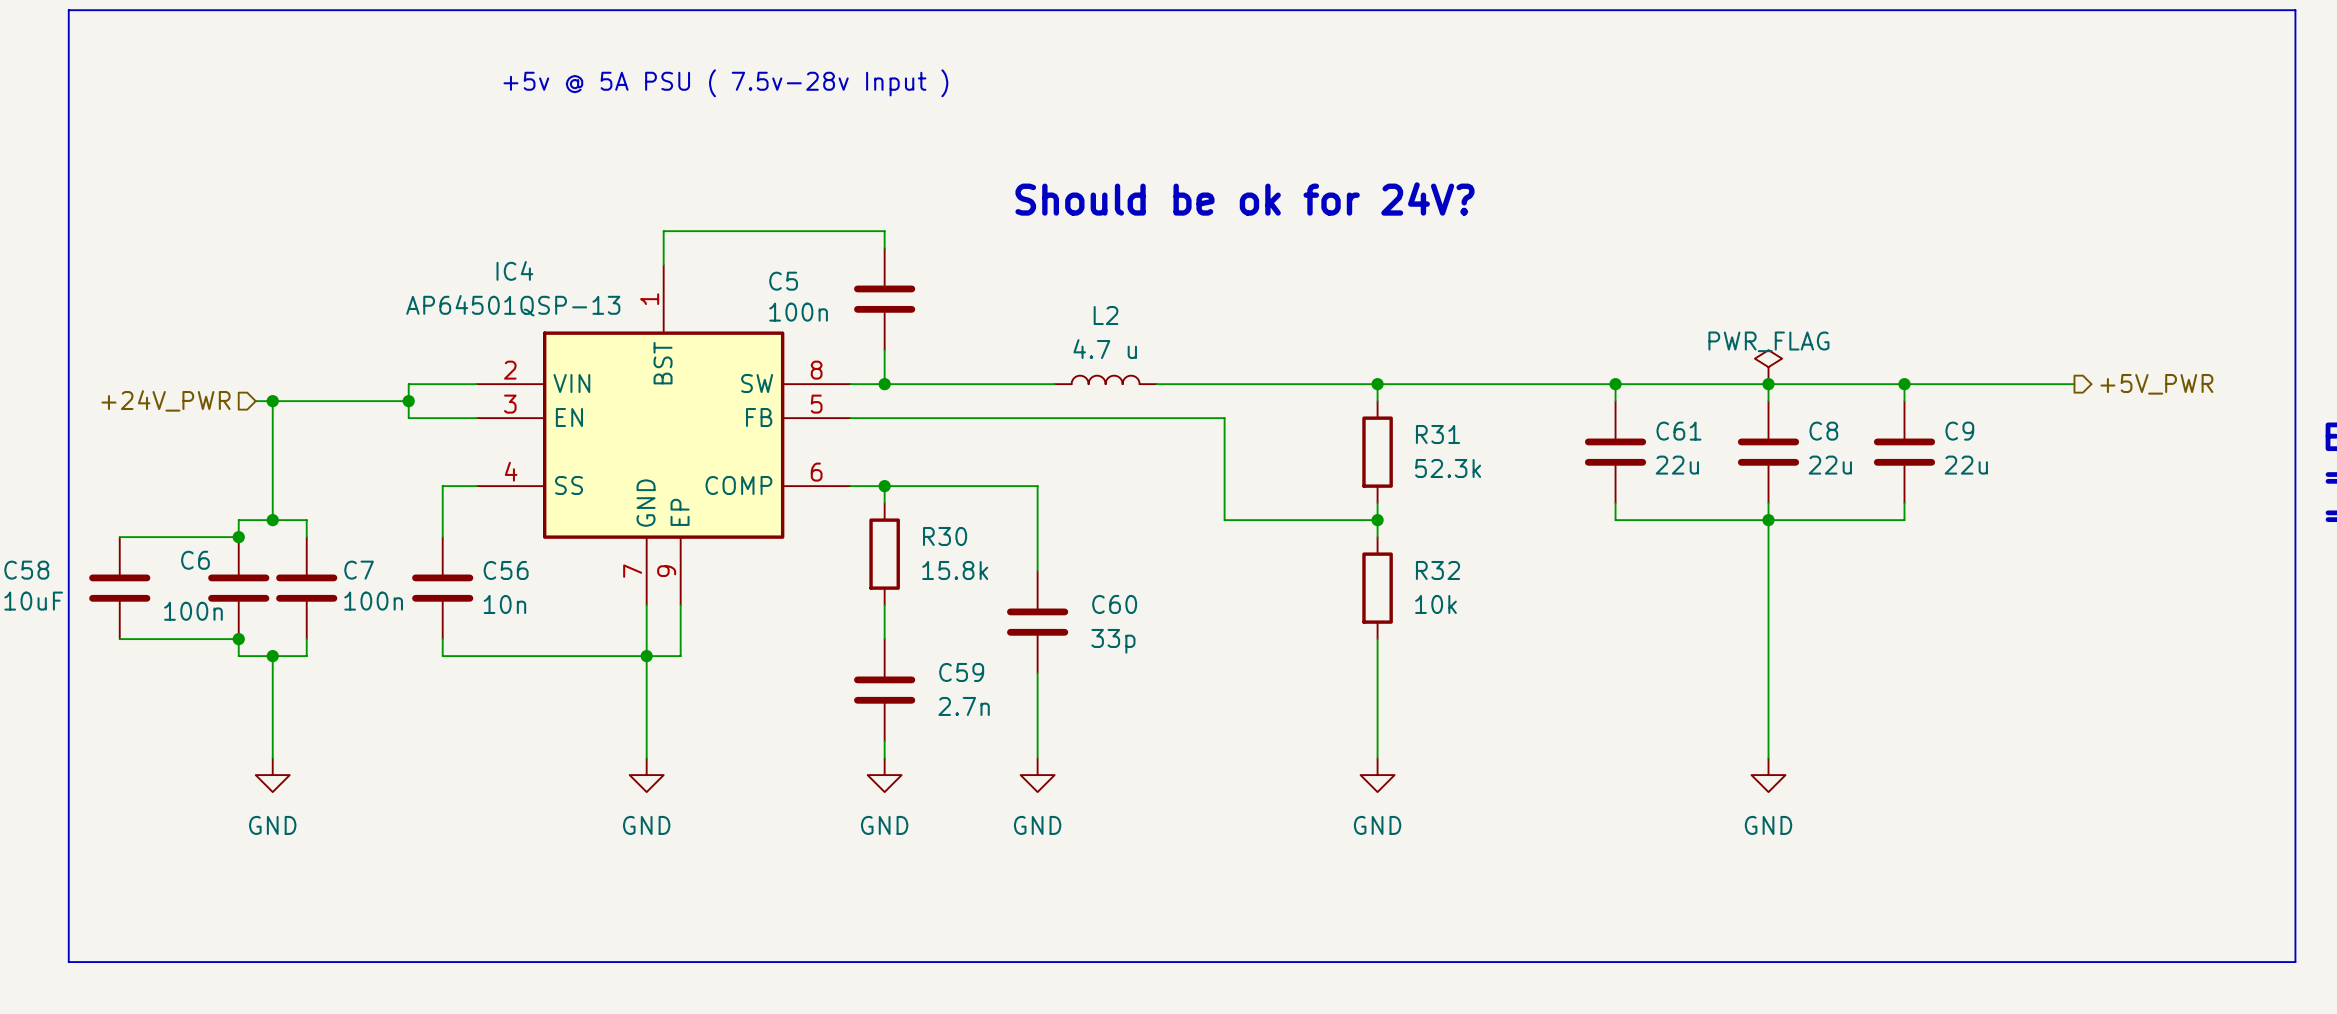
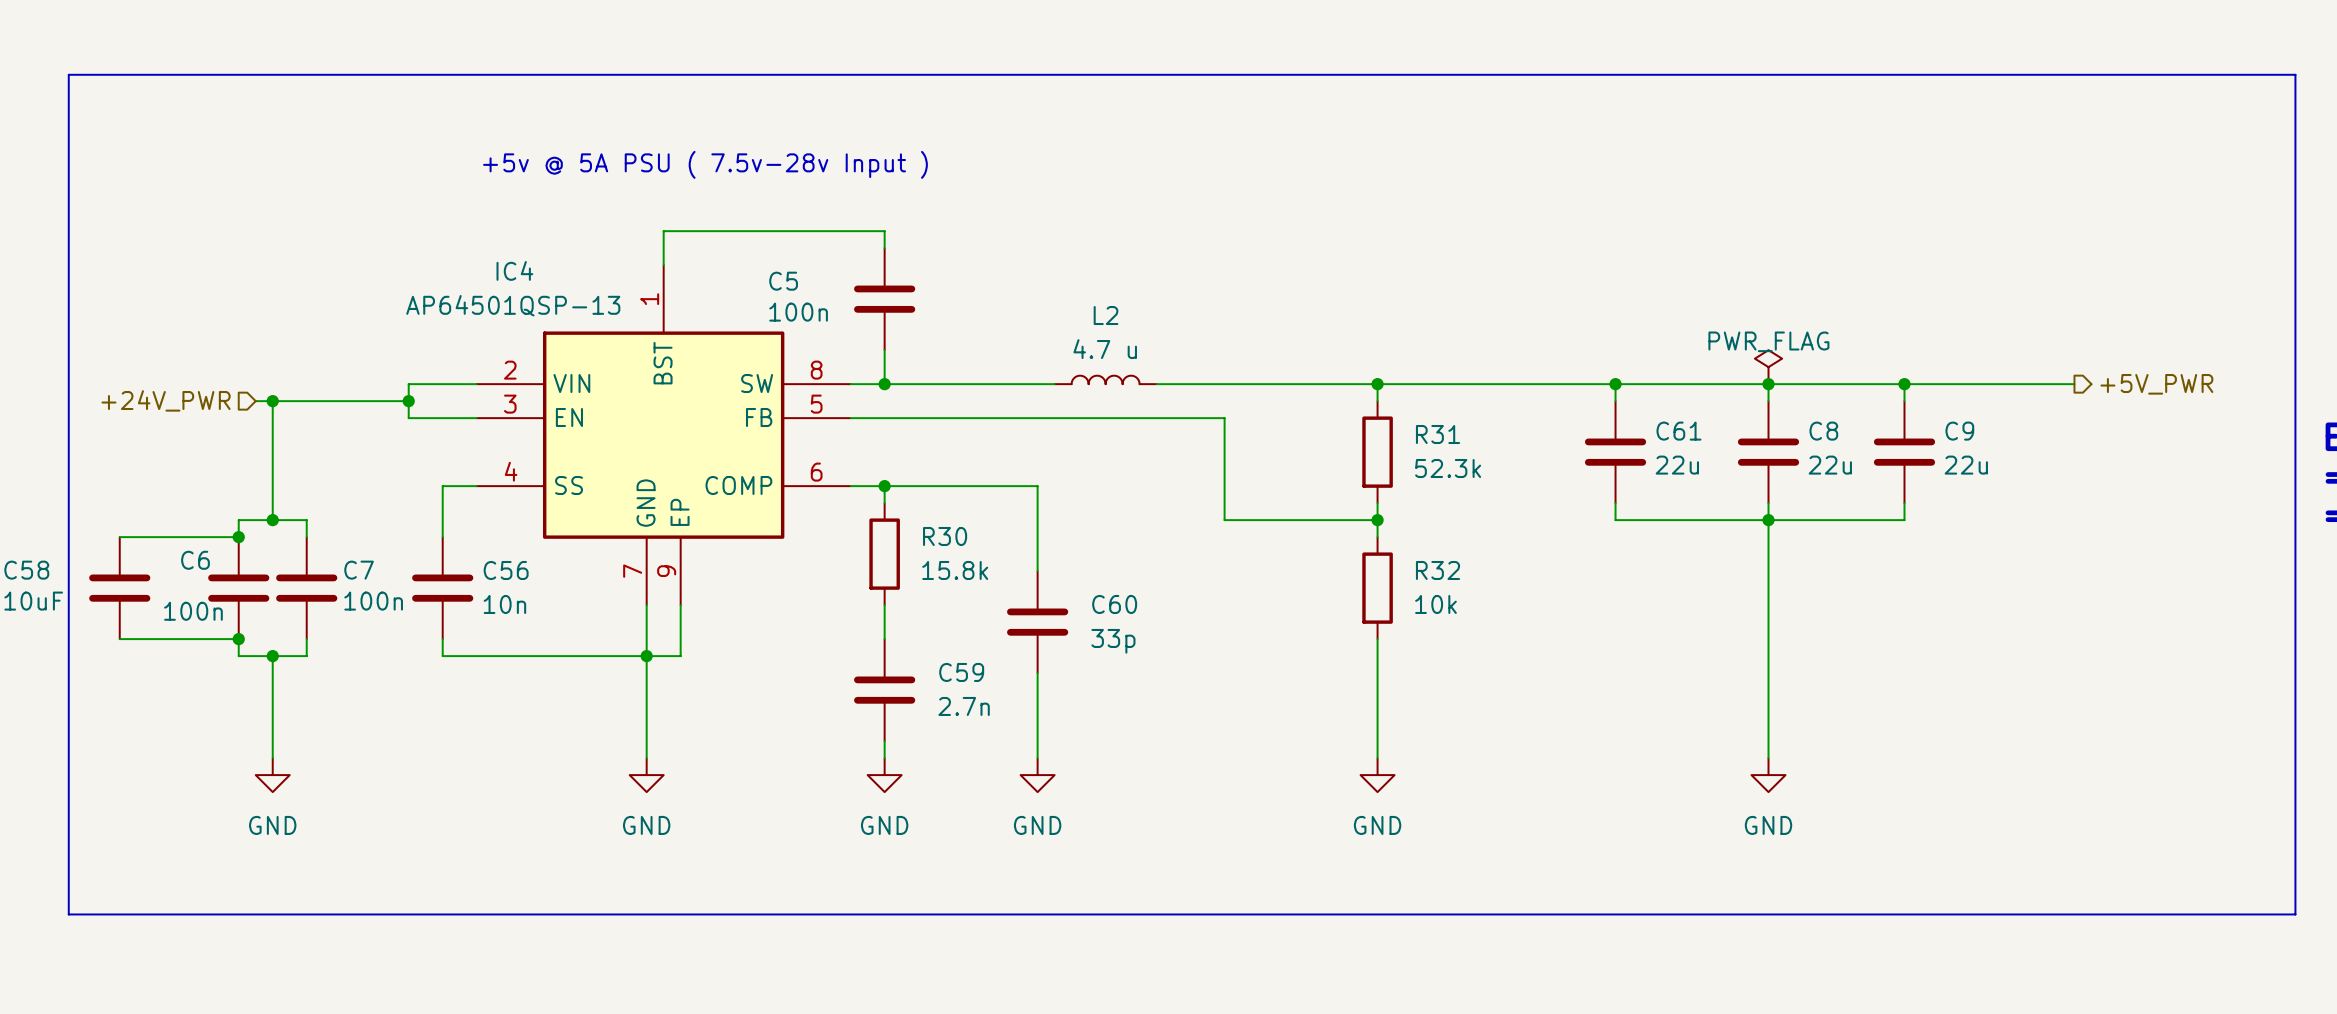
line: (68, 74) (68, 10) (2295, 10) (2295, 74) -> (68, 74) (2295, 74)
text position: +5v @ 5A PSU ( 7.5v-28v Input ) (725, 83) -> +5v @ 5A PSU ( 7.5v-28v Input ) (705, 164)
text: Should be ok for 24V? (1244, 198) -> none
line: (68, 914) (68, 962) (2295, 962) (2295, 914) -> (68, 914) (2295, 914)

